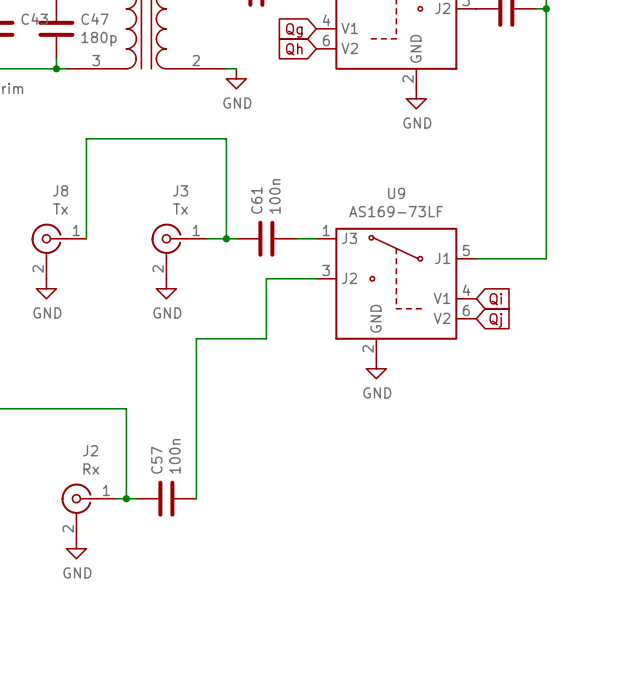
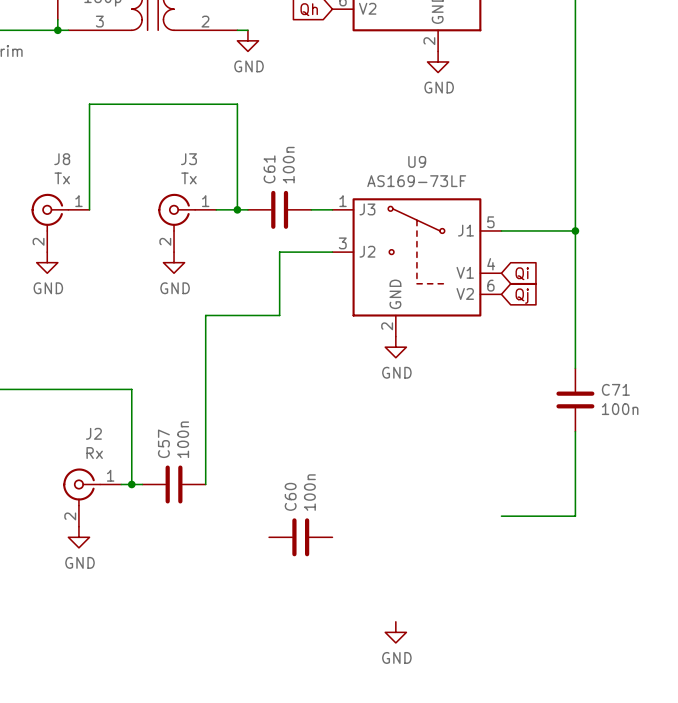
wire: none -> (575, 230) (575, 368)
junction: none -> (575, 230)
C71: none -> 100n (575, 399)
wire: none -> (575, 431) (575, 516) (501, 516)
C60: none -> 100n (300, 537)
power symbol: none -> GND (395, 632)

